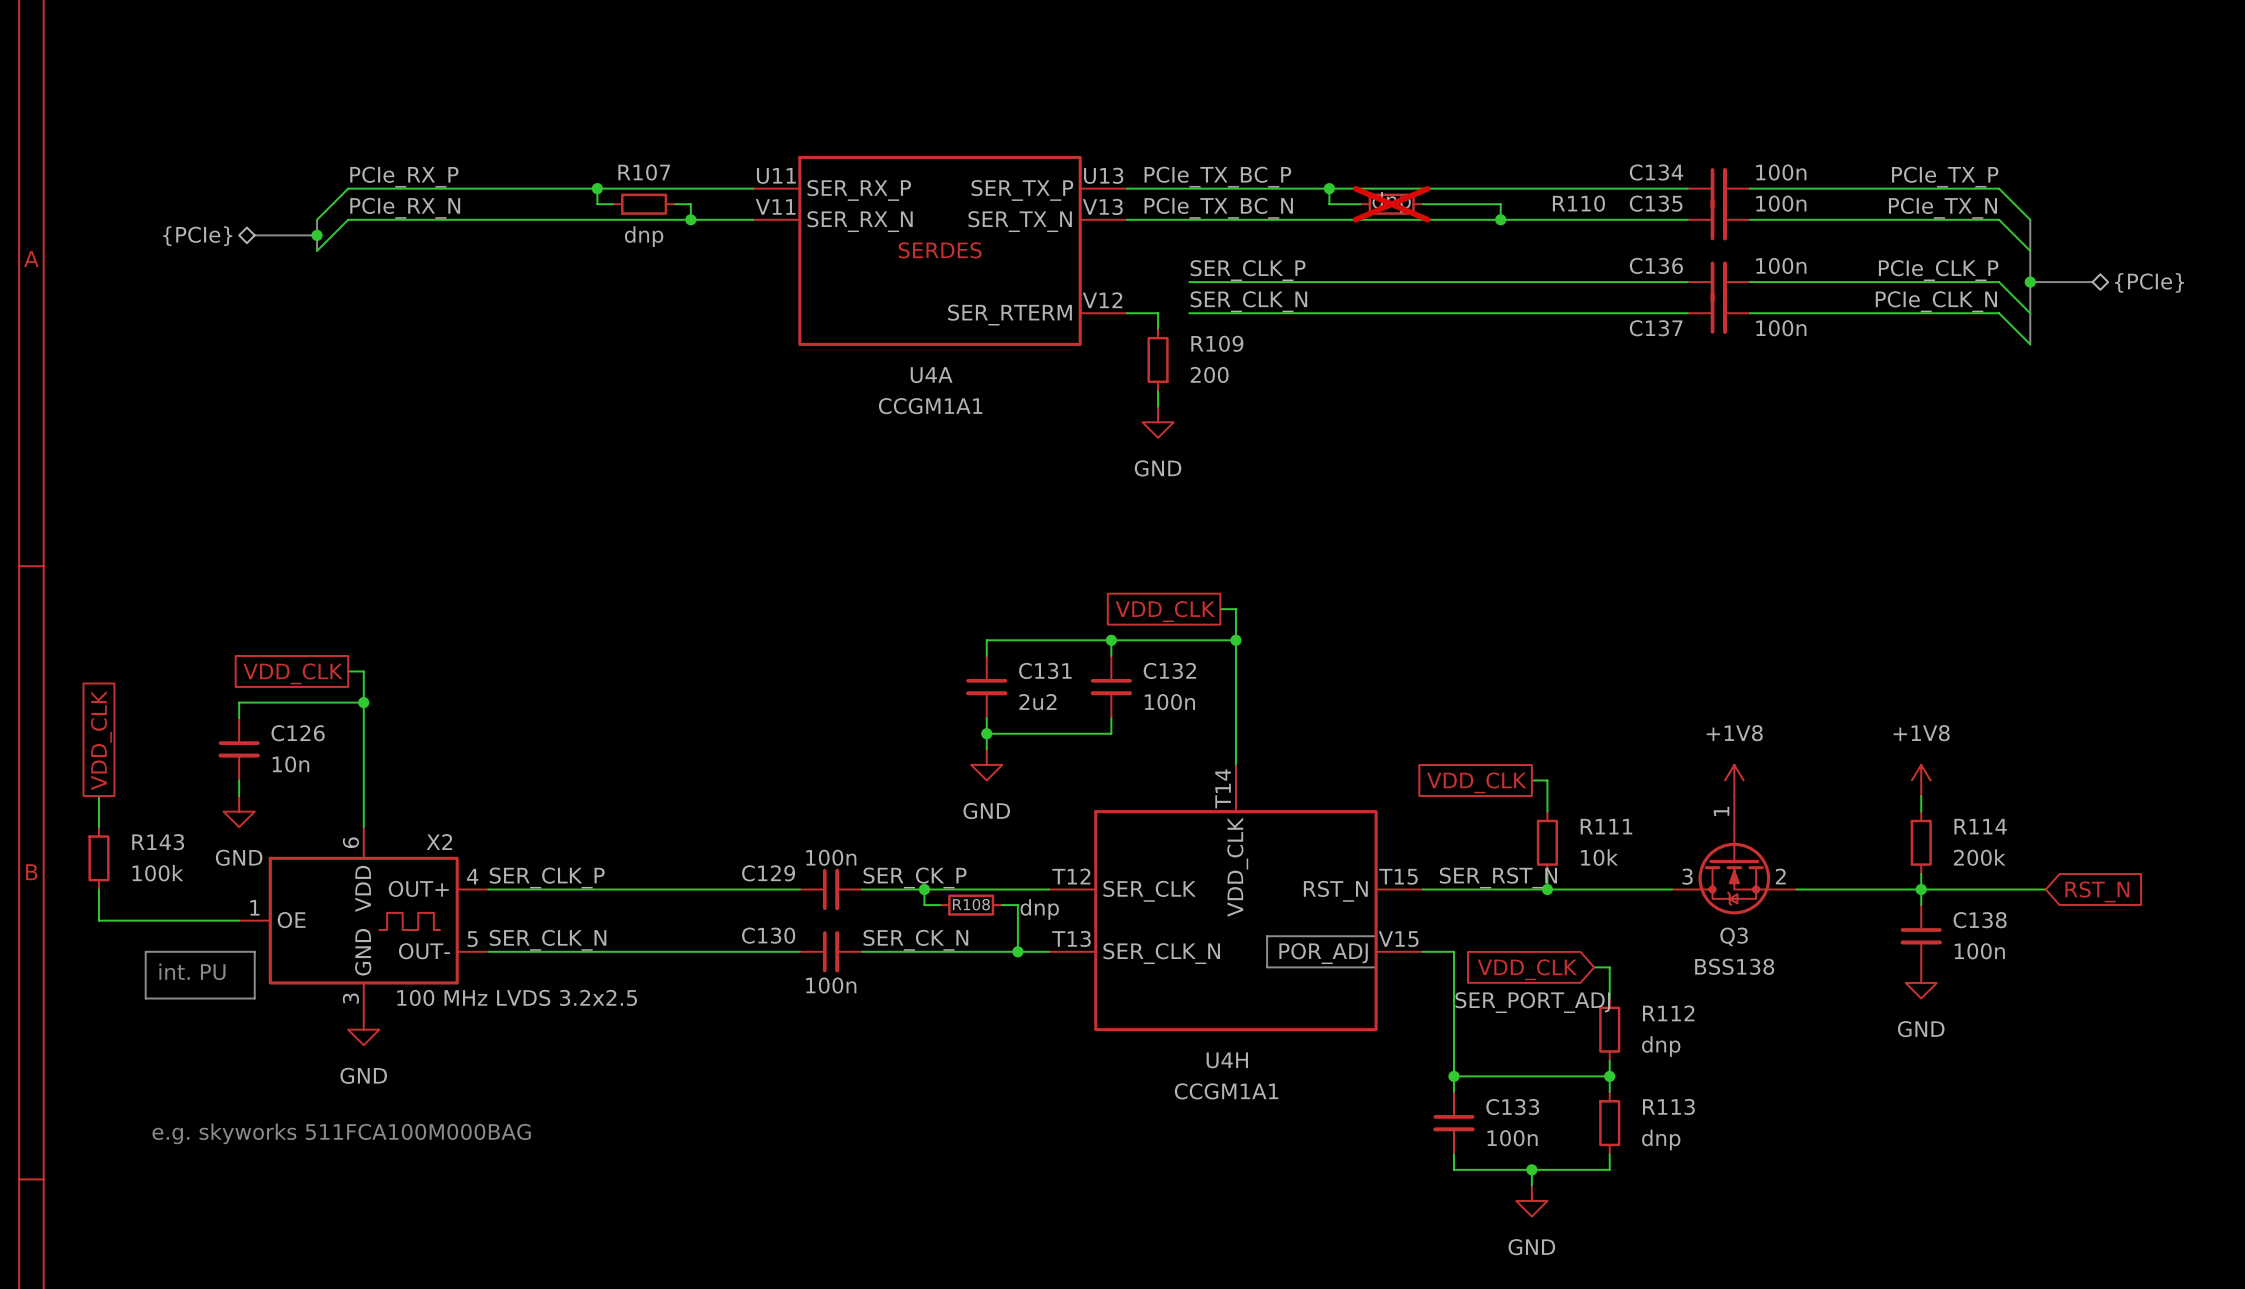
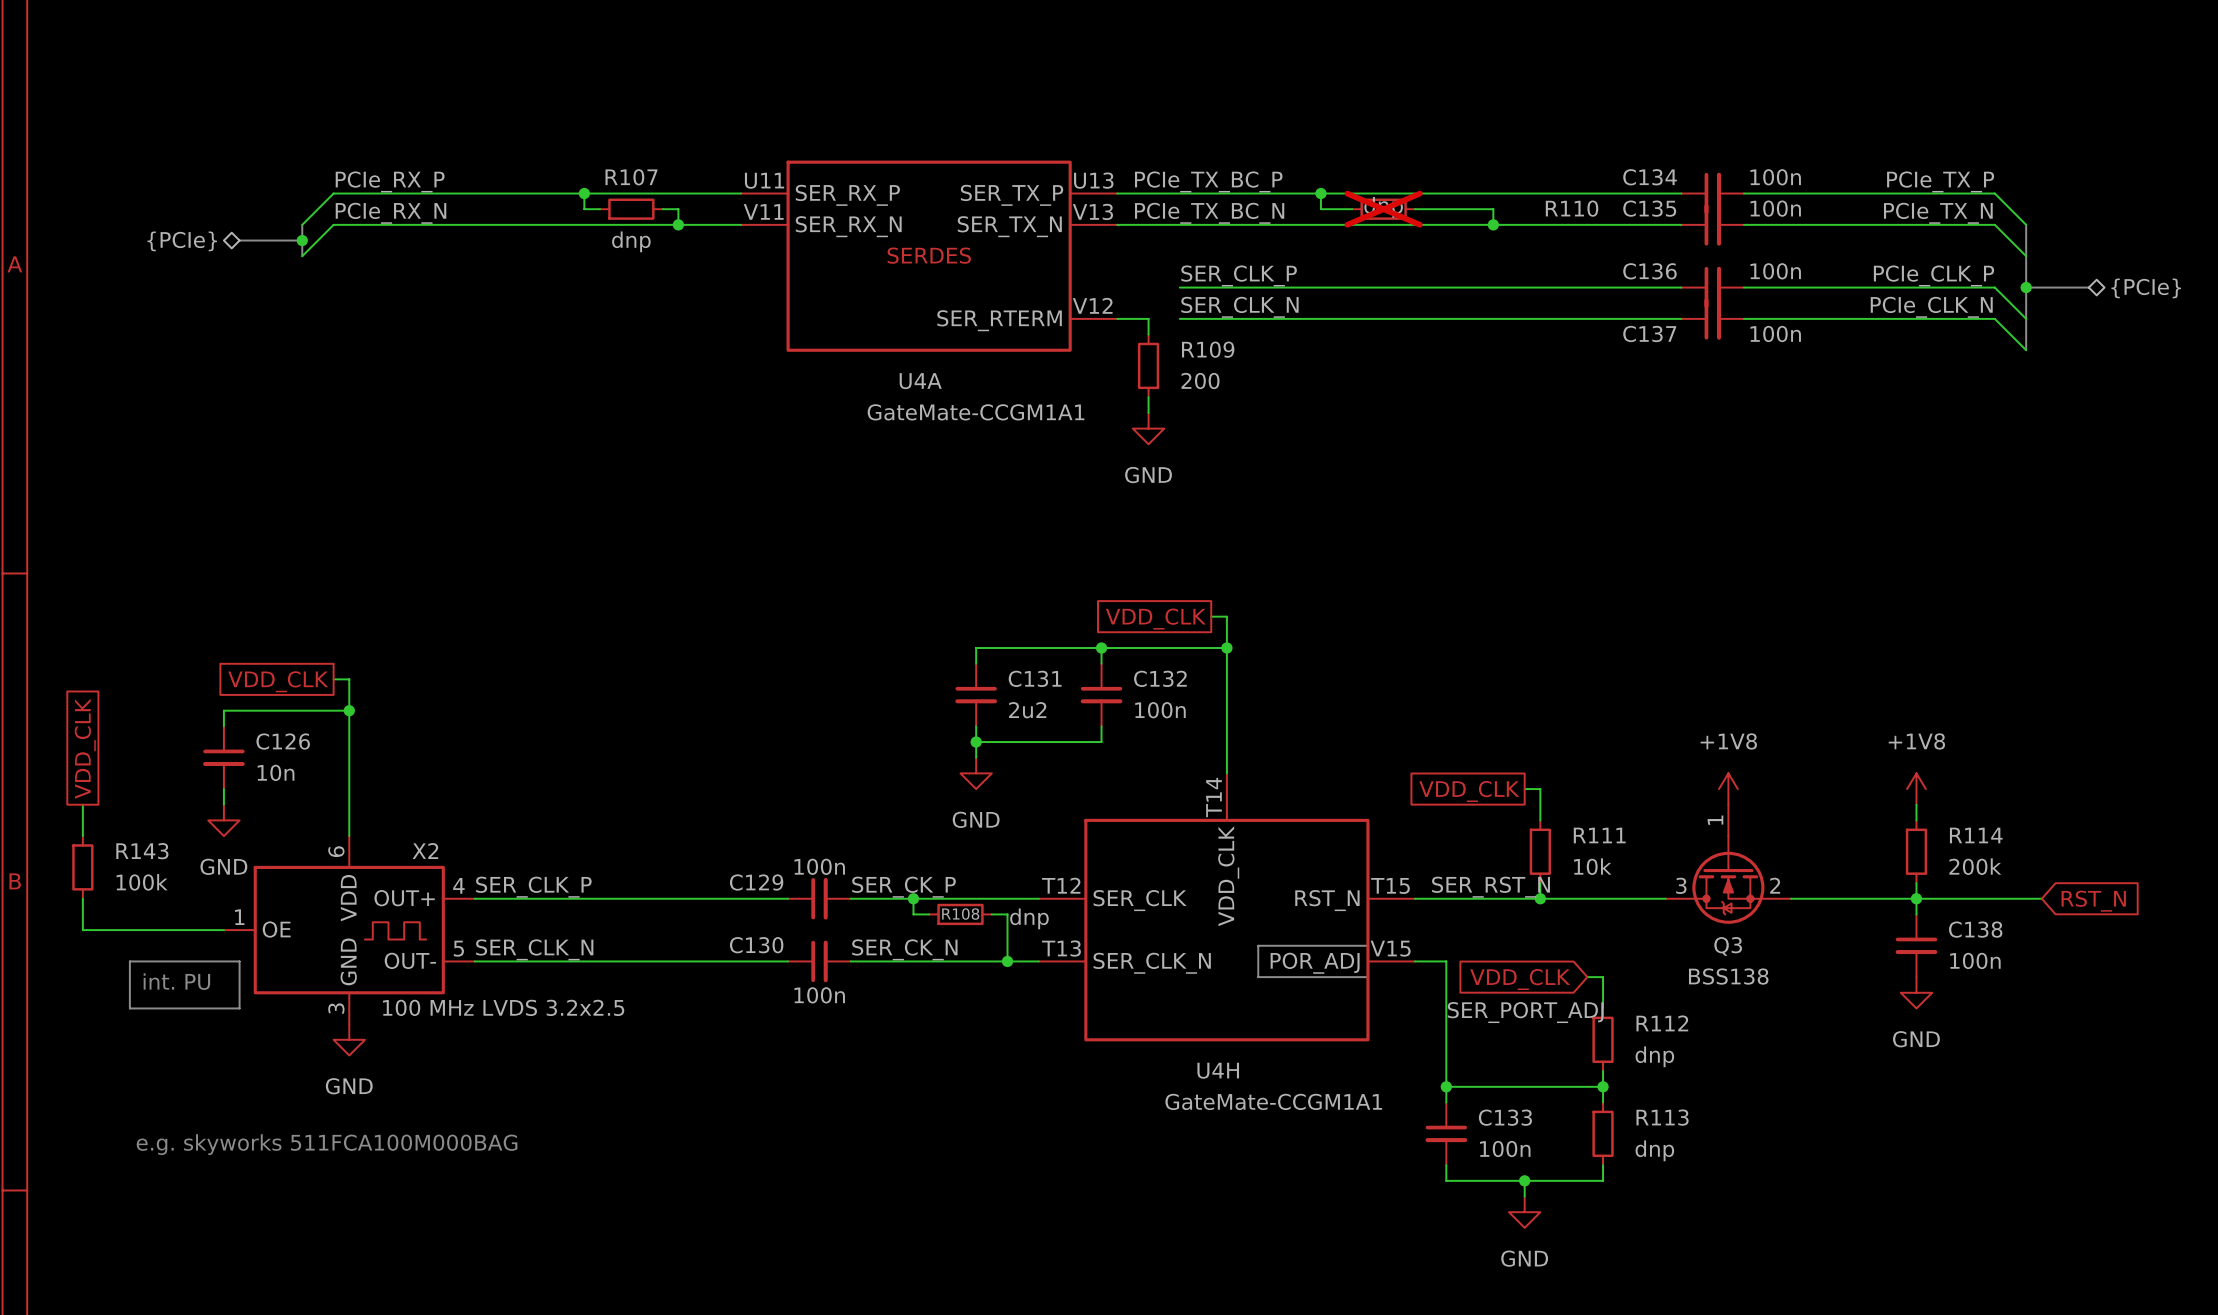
U4A value: CCGM1A1 (930, 406) -> GateMate-CCGM1A1 (976, 412)
U4H value: CCGM1A1 (1226, 1091) -> GateMate-CCGM1A1 (1273, 1101)

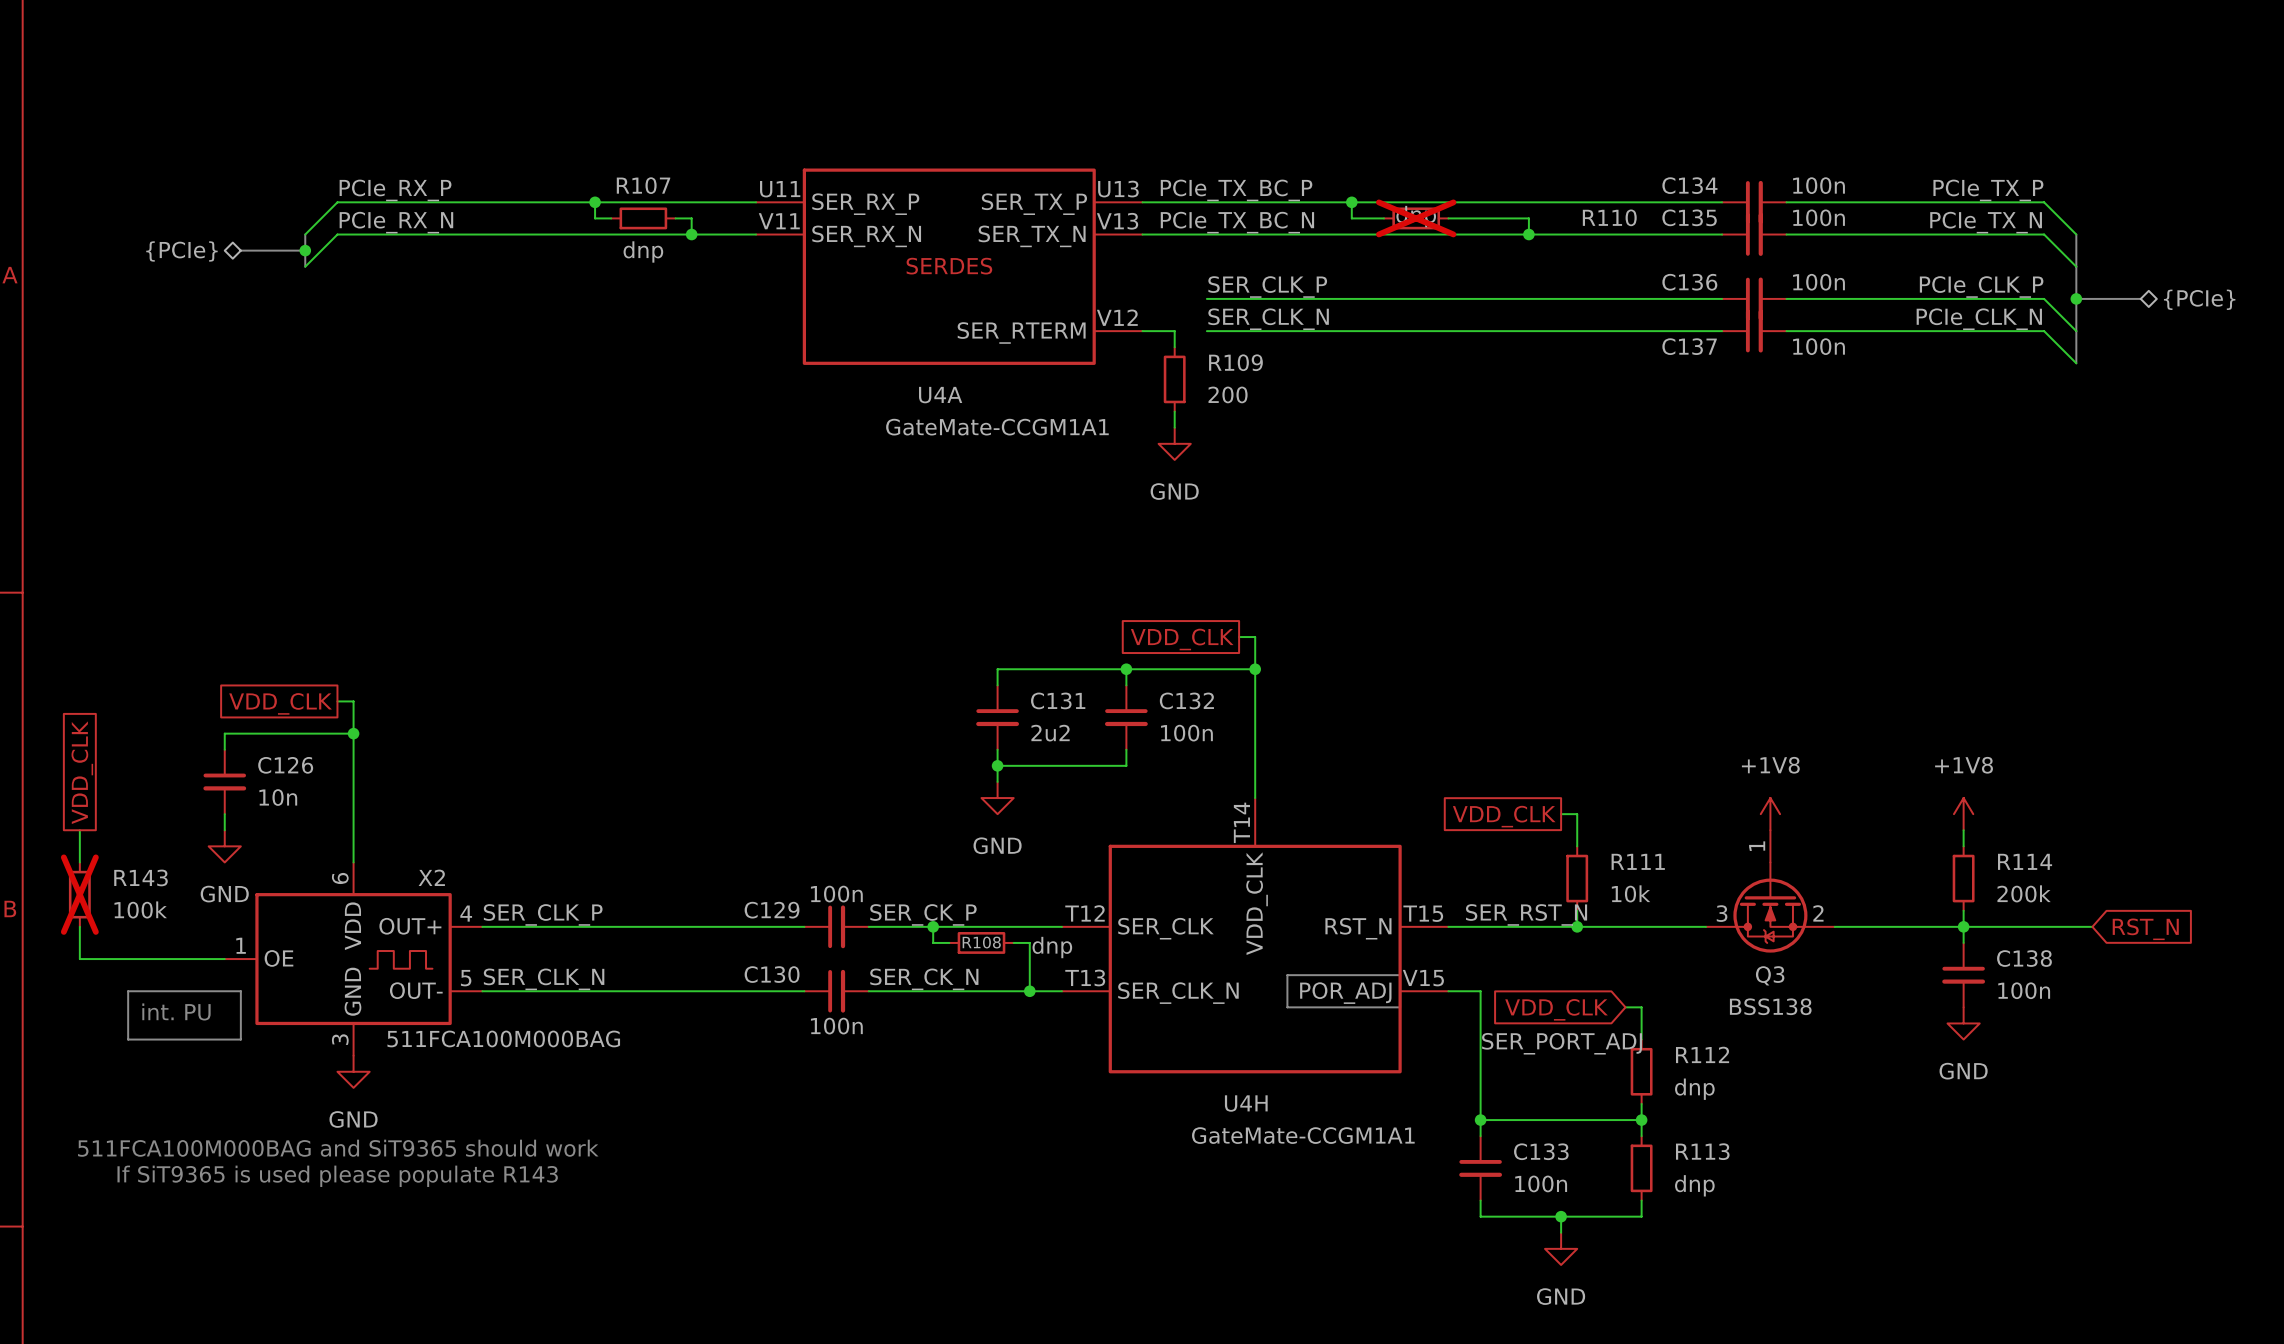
R143 do-not-place cross: none -> (79, 894)
X2 value: 100 MHz LVDS 3.2x2.5 (503, 1007) -> 511FCA100M000BAG (503, 1038)
text: none -> 511FCA100M000BAG and SiT9365 should work (338, 1148)
text: e.g. skyworks 511FCA100M000BAG (327, 1144) -> If SiT9365 is used please populate R143 (337, 1176)

